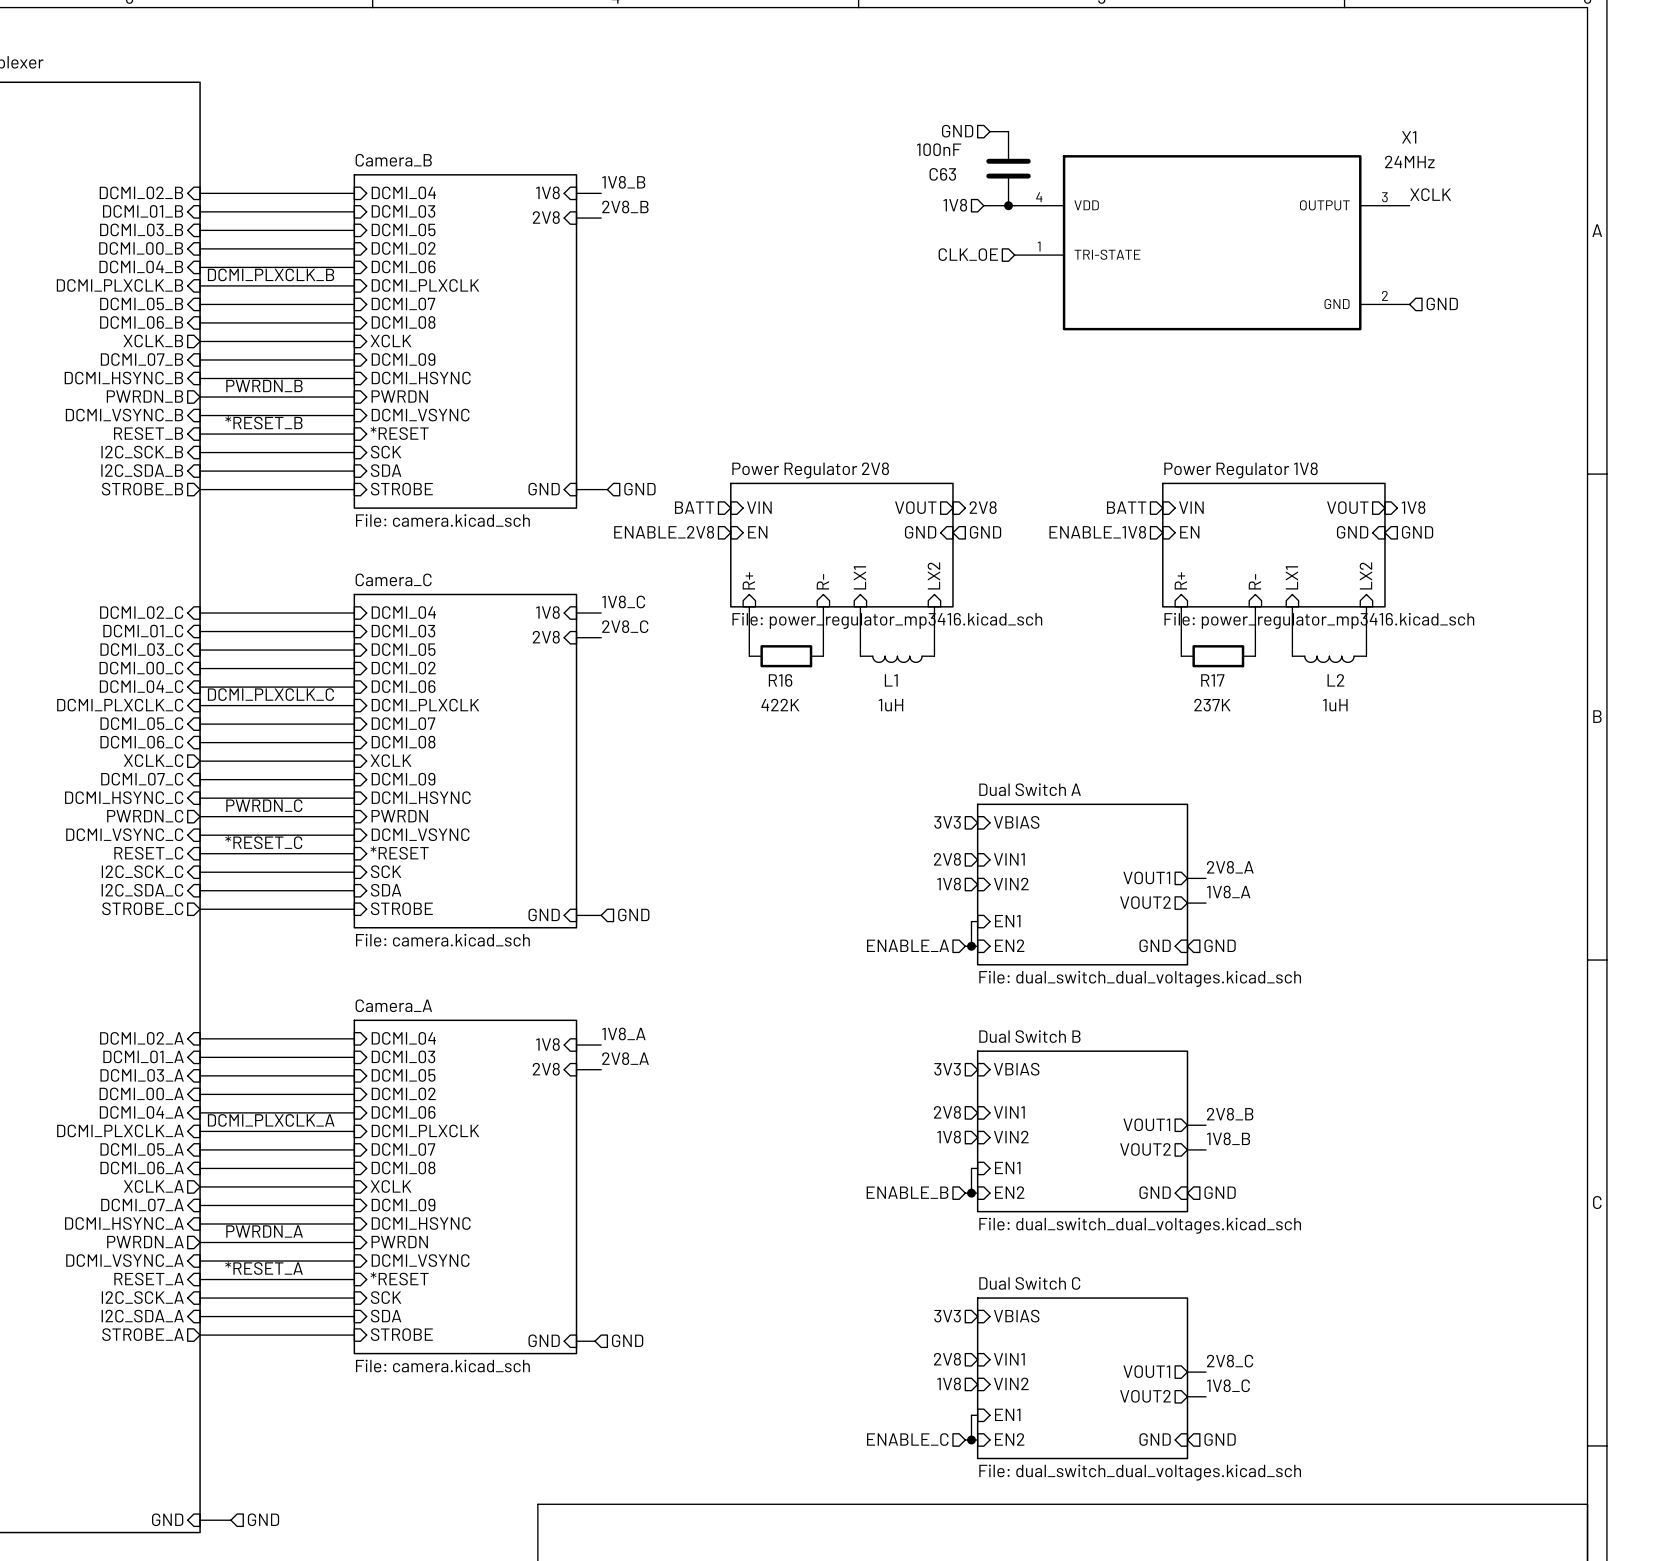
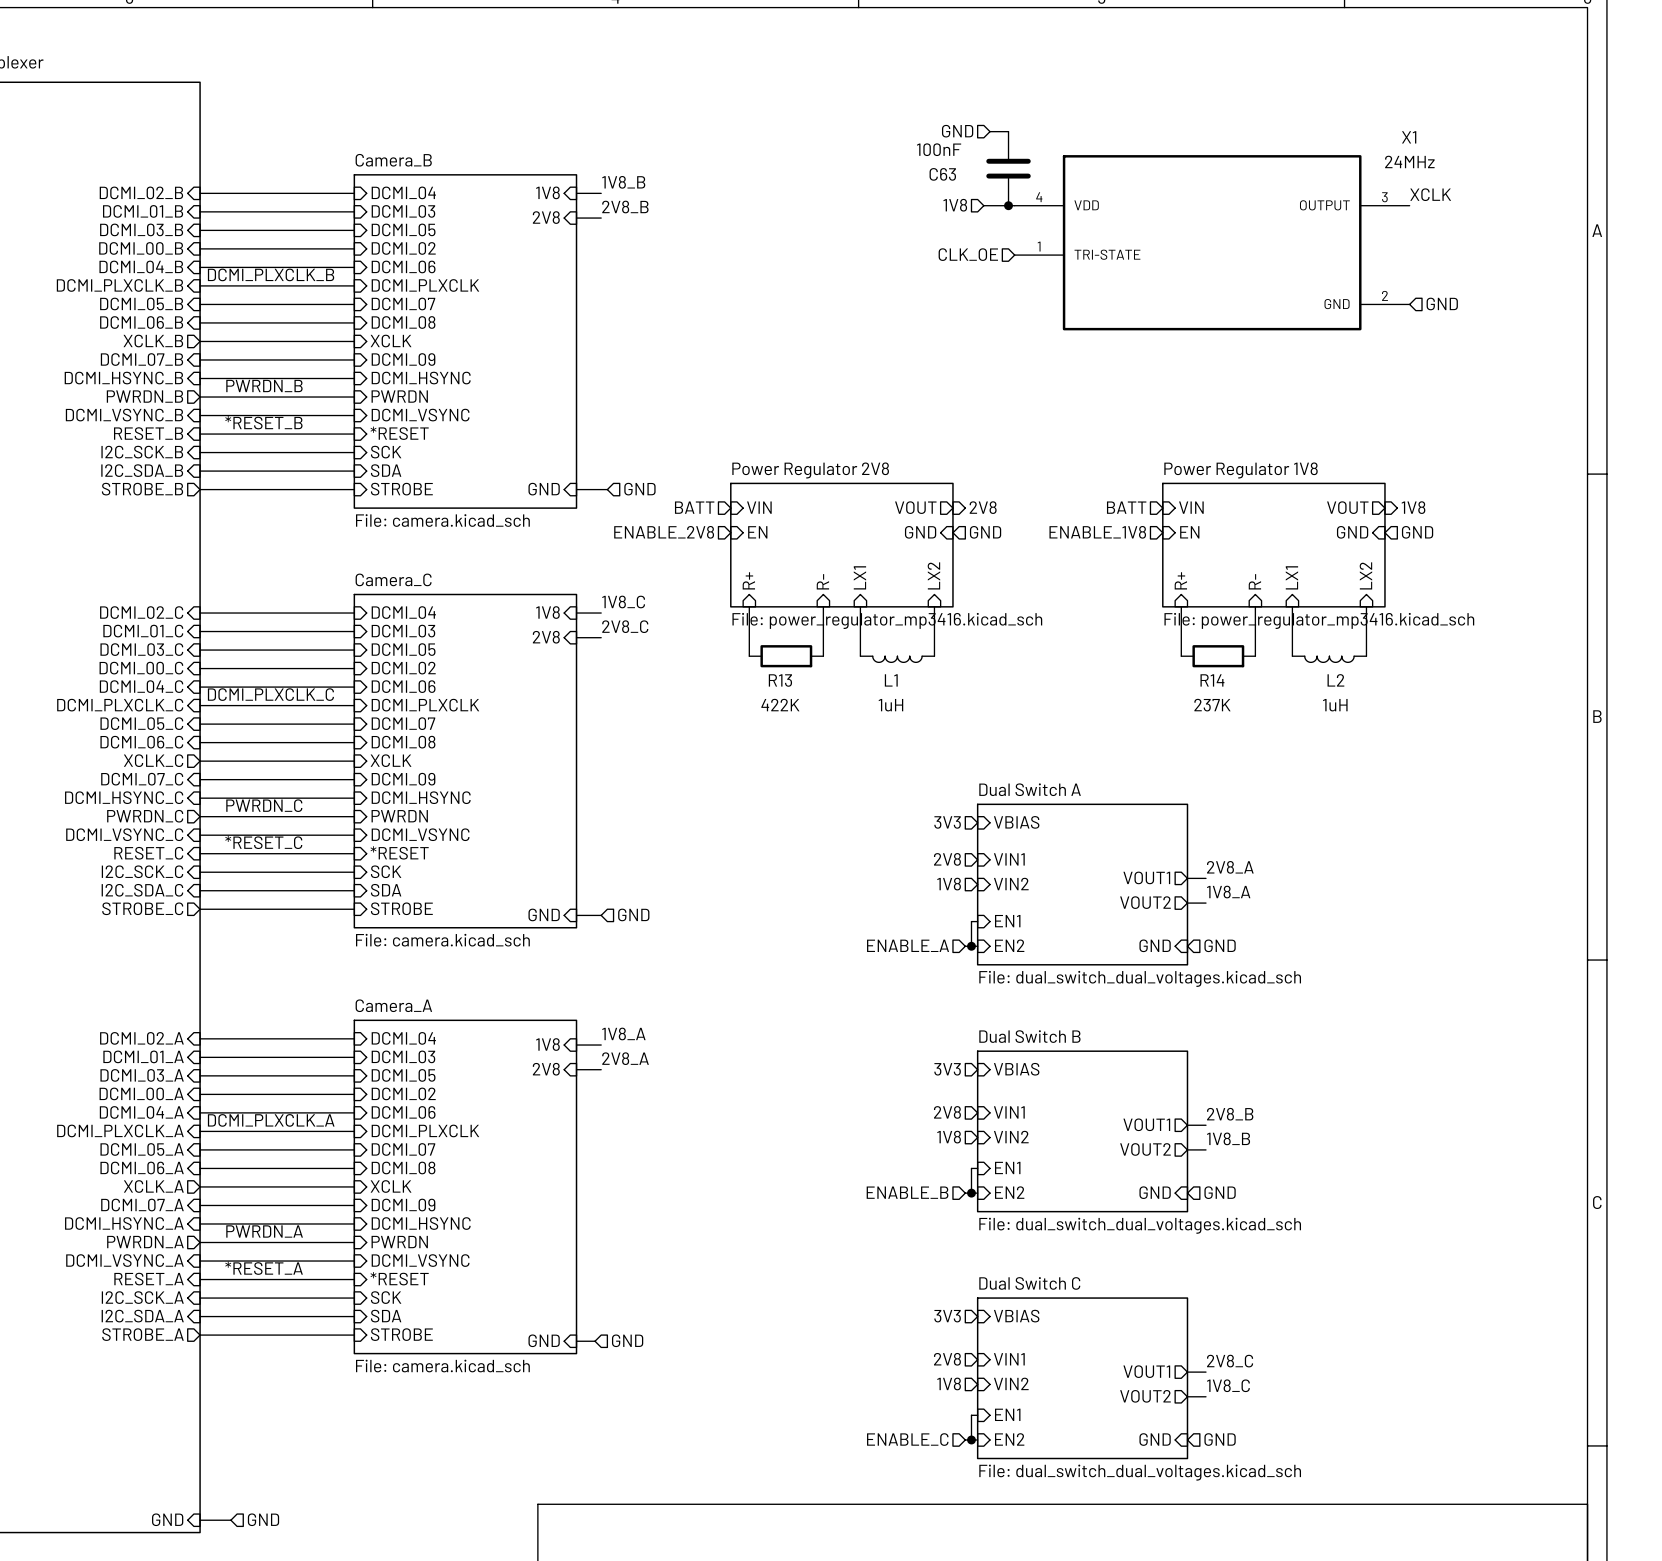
R16 name: R16 (780, 680) -> R13 (780, 680)
R17 name: R17 (1212, 680) -> R14 (1212, 680)

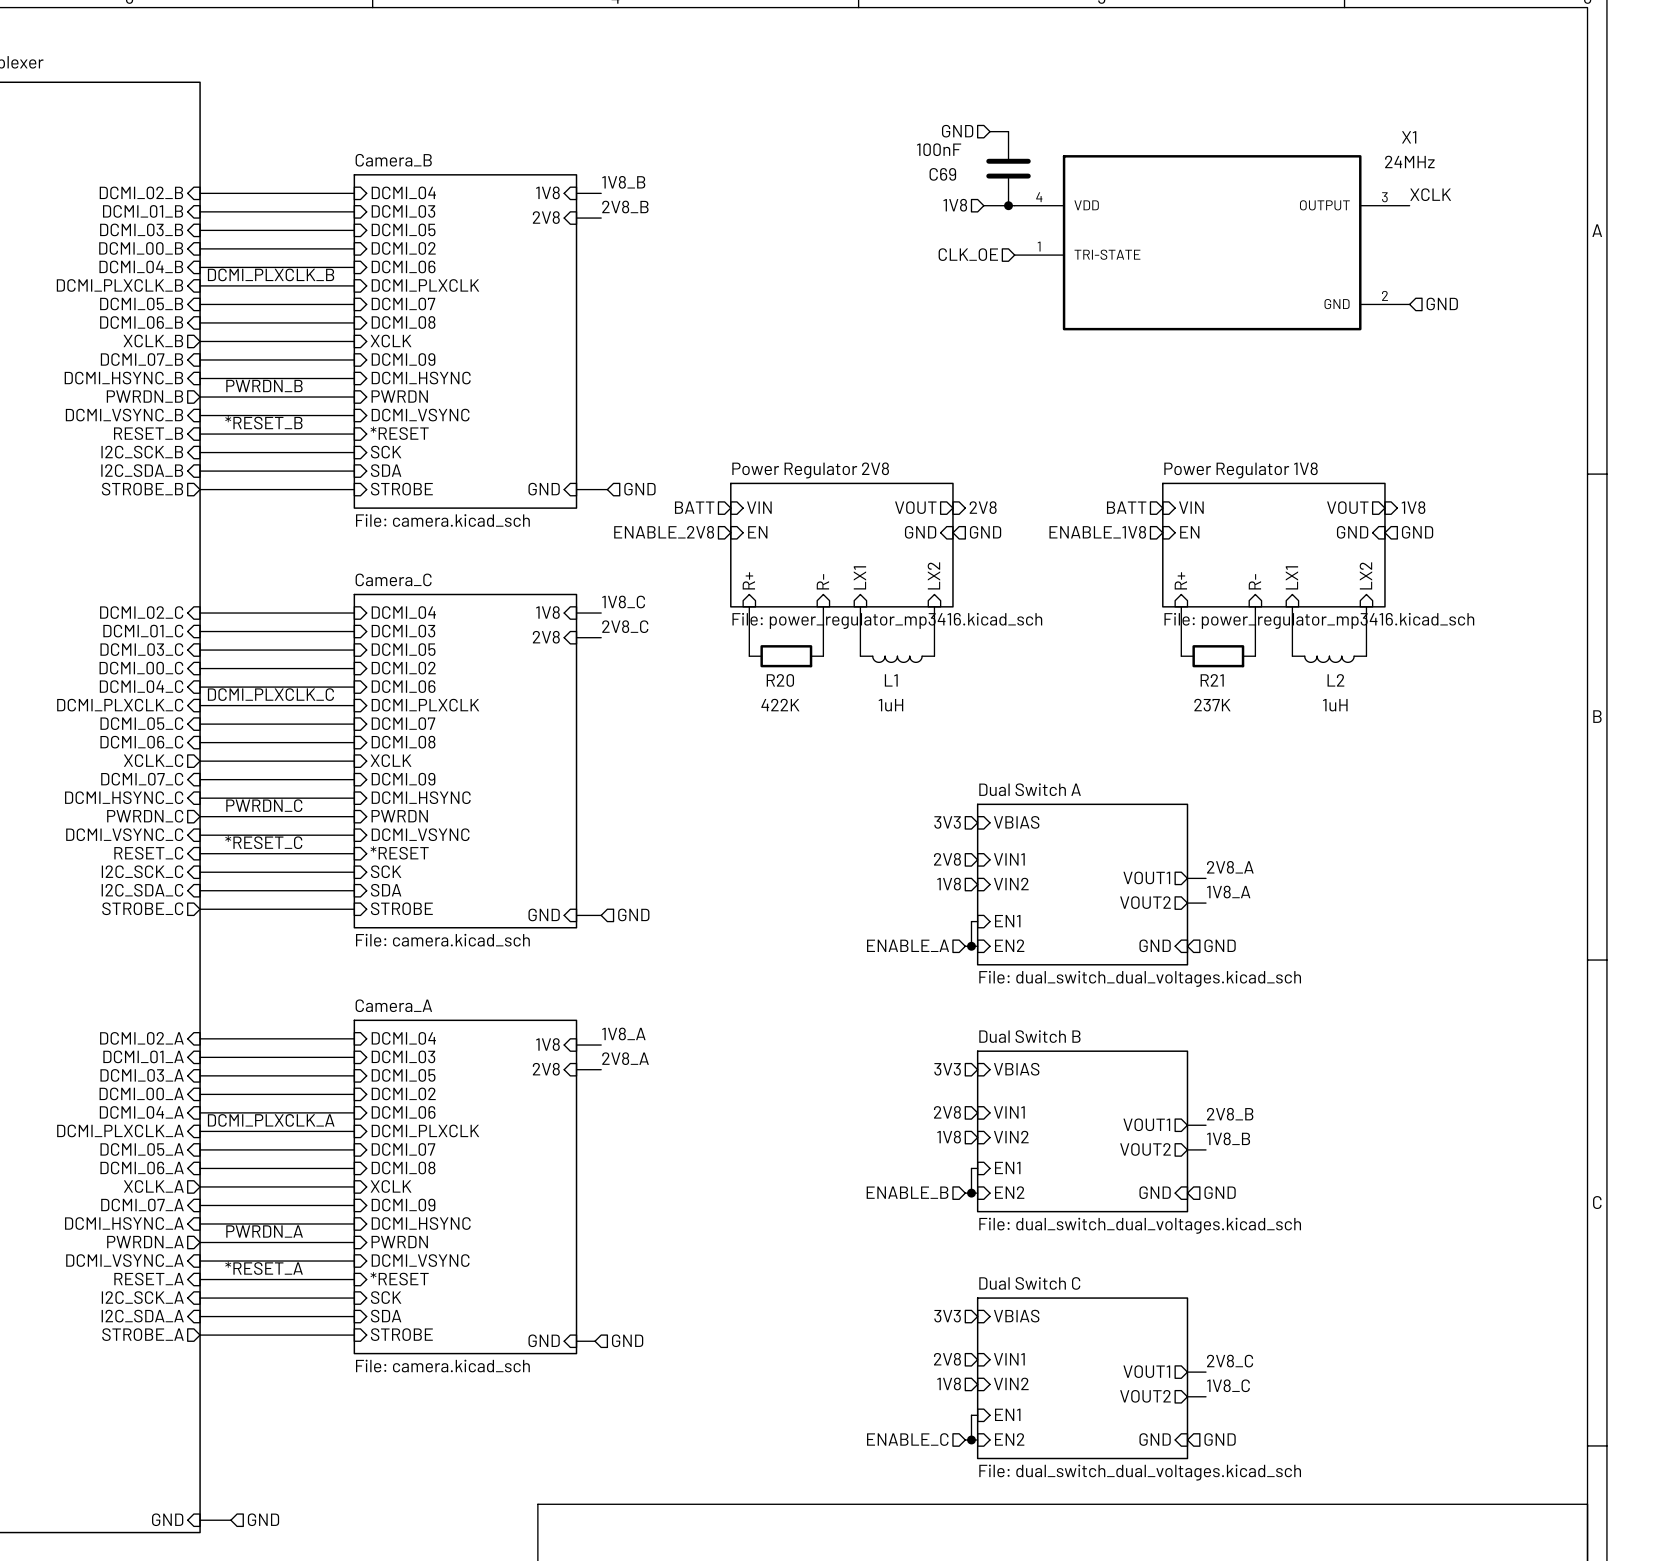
C63 name: C63 (942, 174) -> C69 (942, 174)
R13 name: R13 (780, 680) -> R20 (780, 680)
R14 name: R14 (1212, 680) -> R21 (1212, 680)

